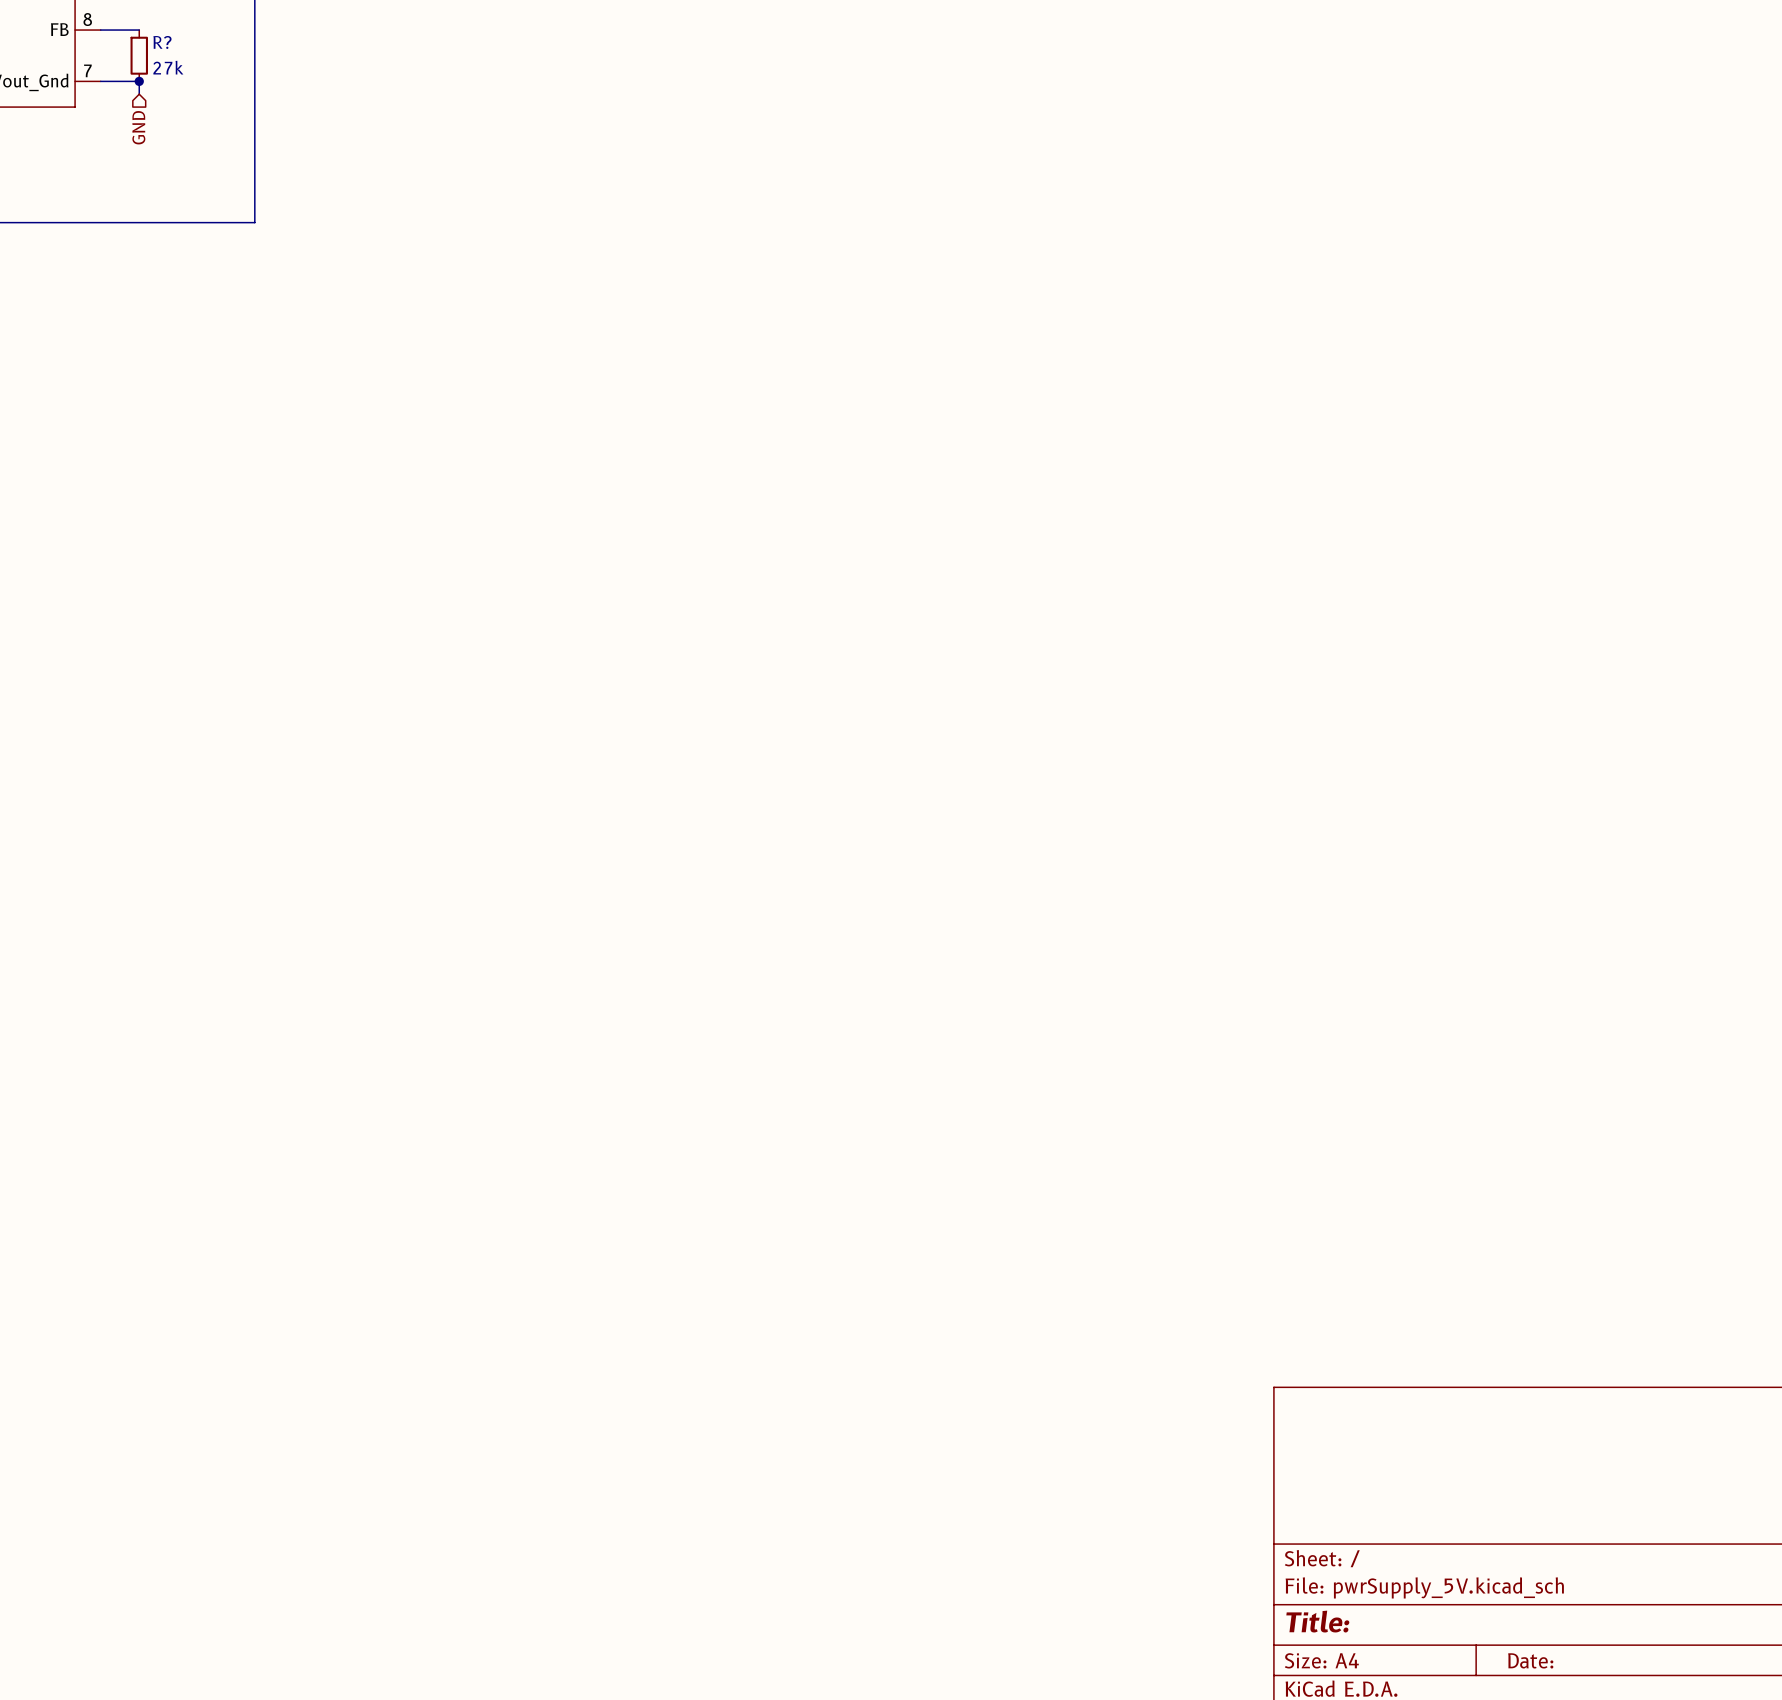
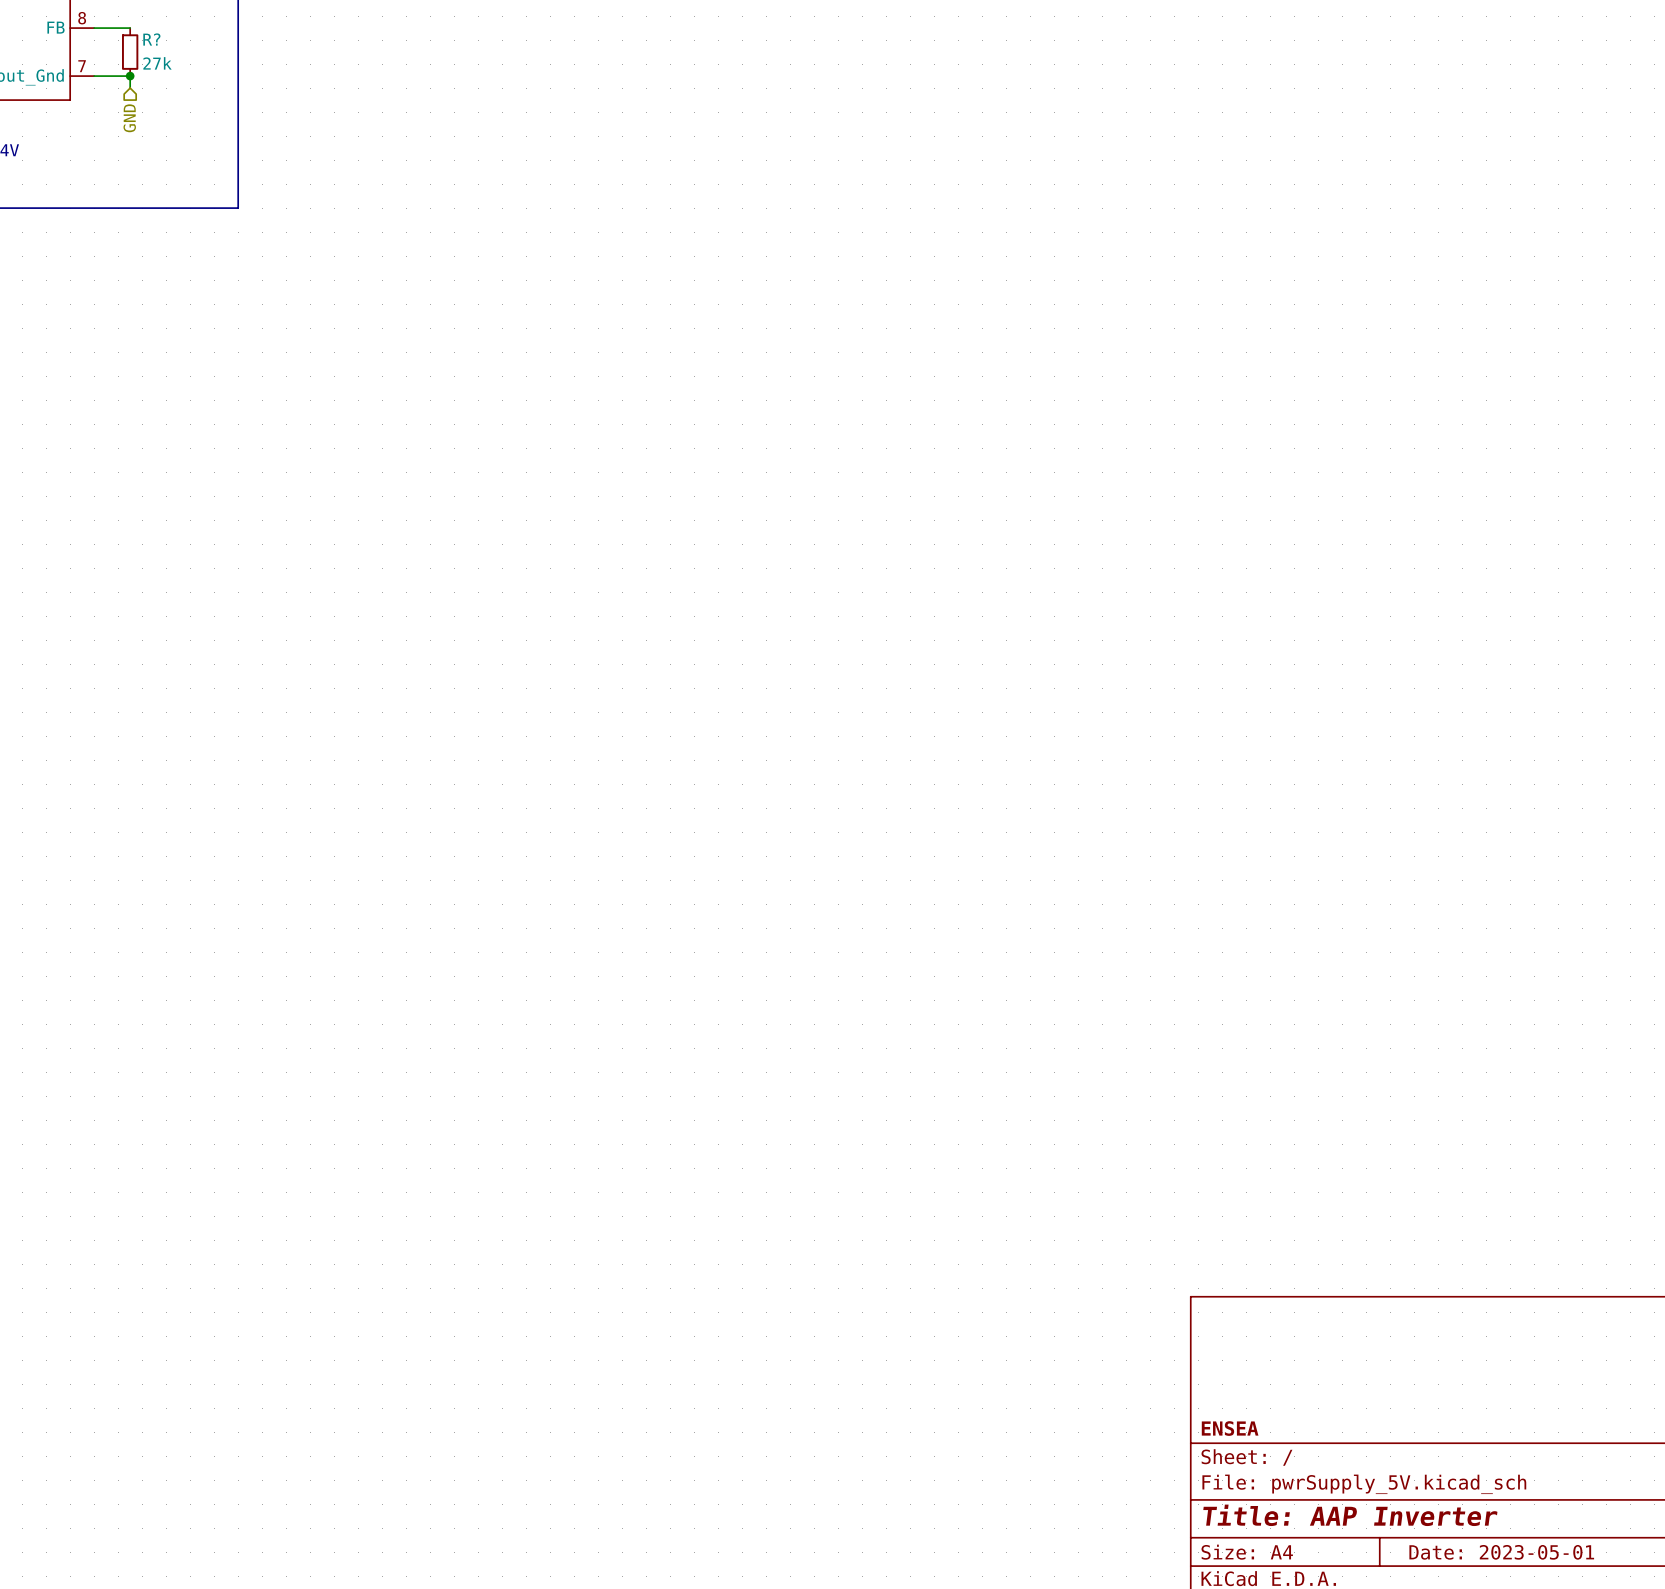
title block: none -> ENSEA (1230, 1428)
title block: Title: (1317, 1621) -> Title: AAP Inverter (1350, 1515)
title block: Date: (1530, 1660) -> Date: 2023-05-01 (1501, 1552)

